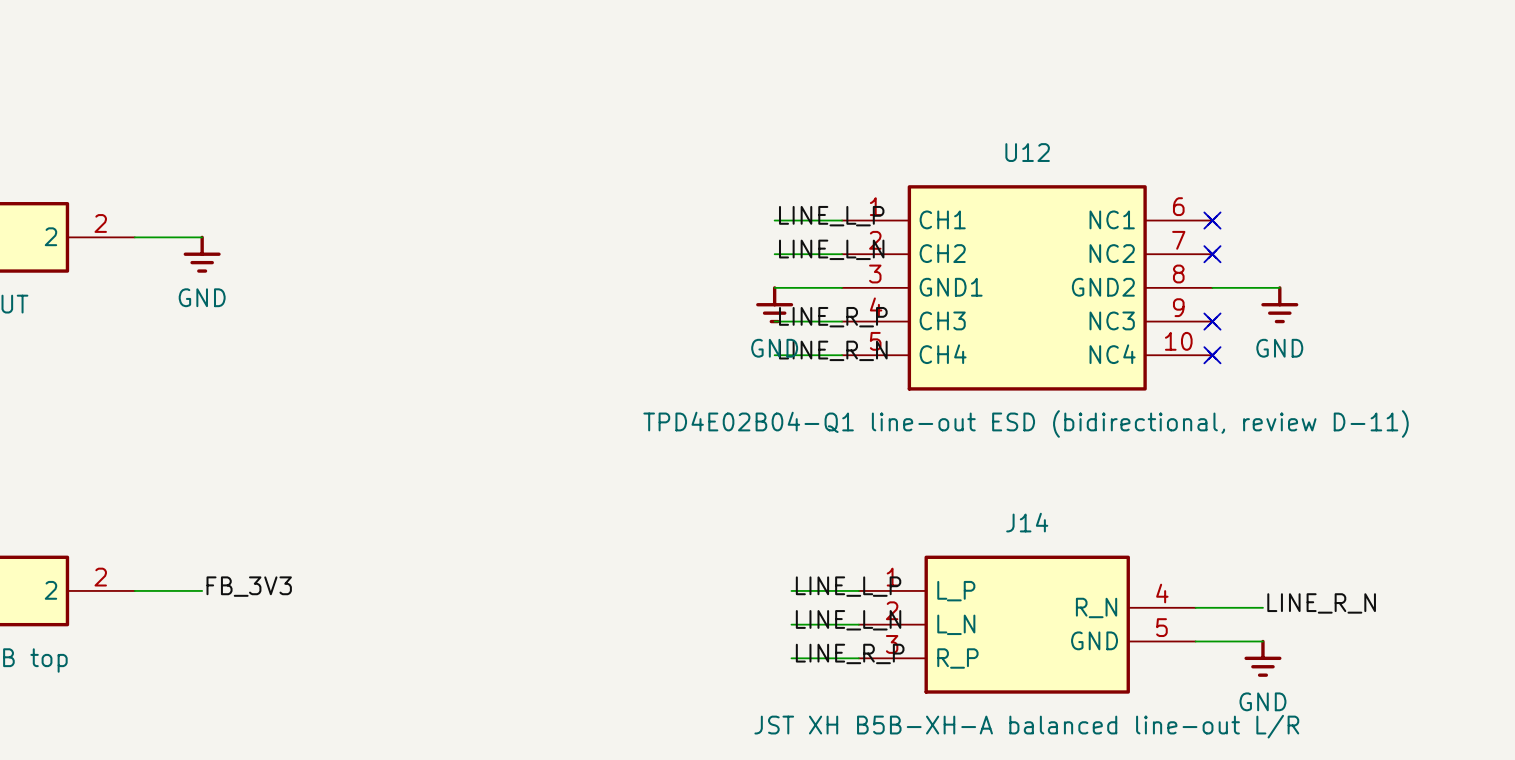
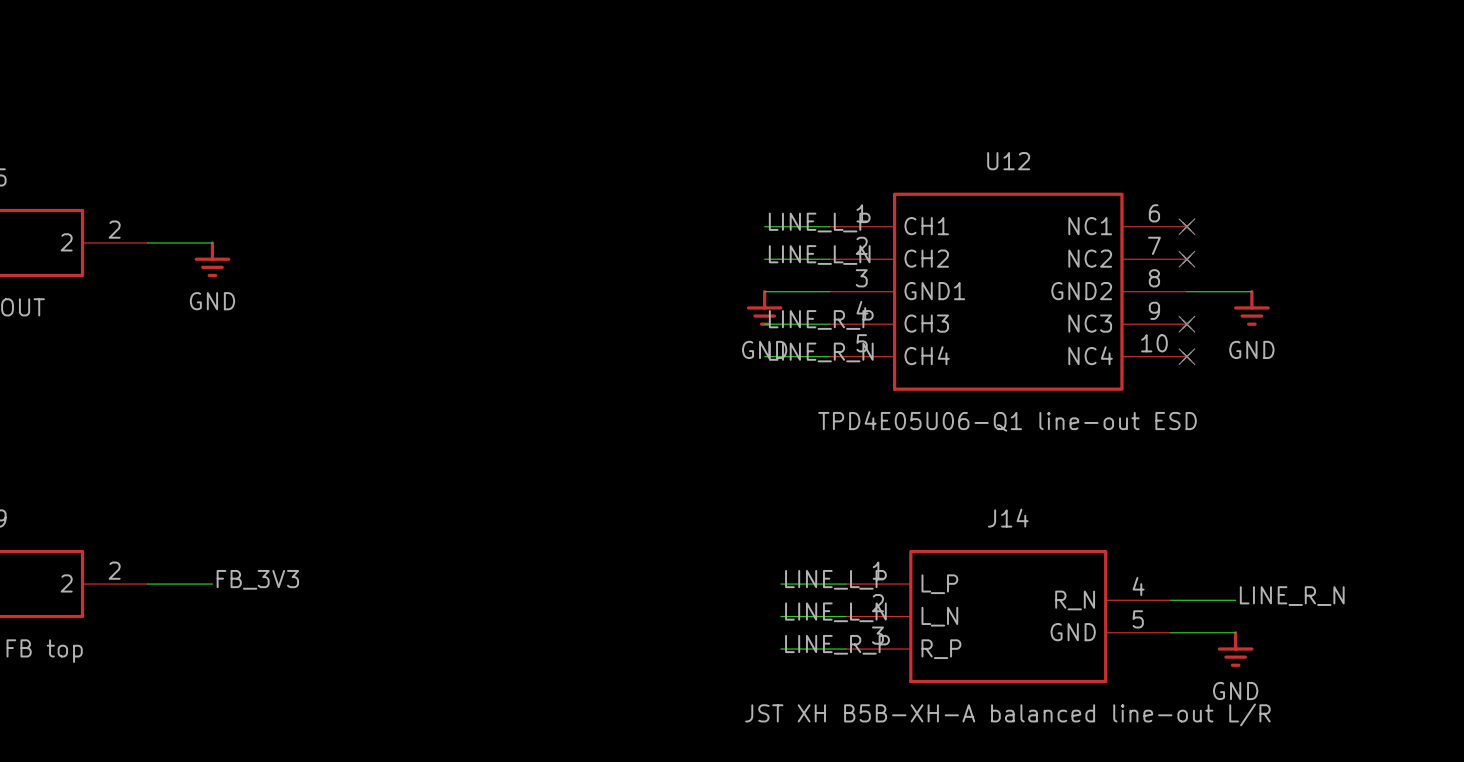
U12 value: TPD4E02B04-Q1 line-out ESD (bidirectional, review D-11) (1026, 423) -> TPD4E05U06-Q1 line-out ESD (1007, 421)

